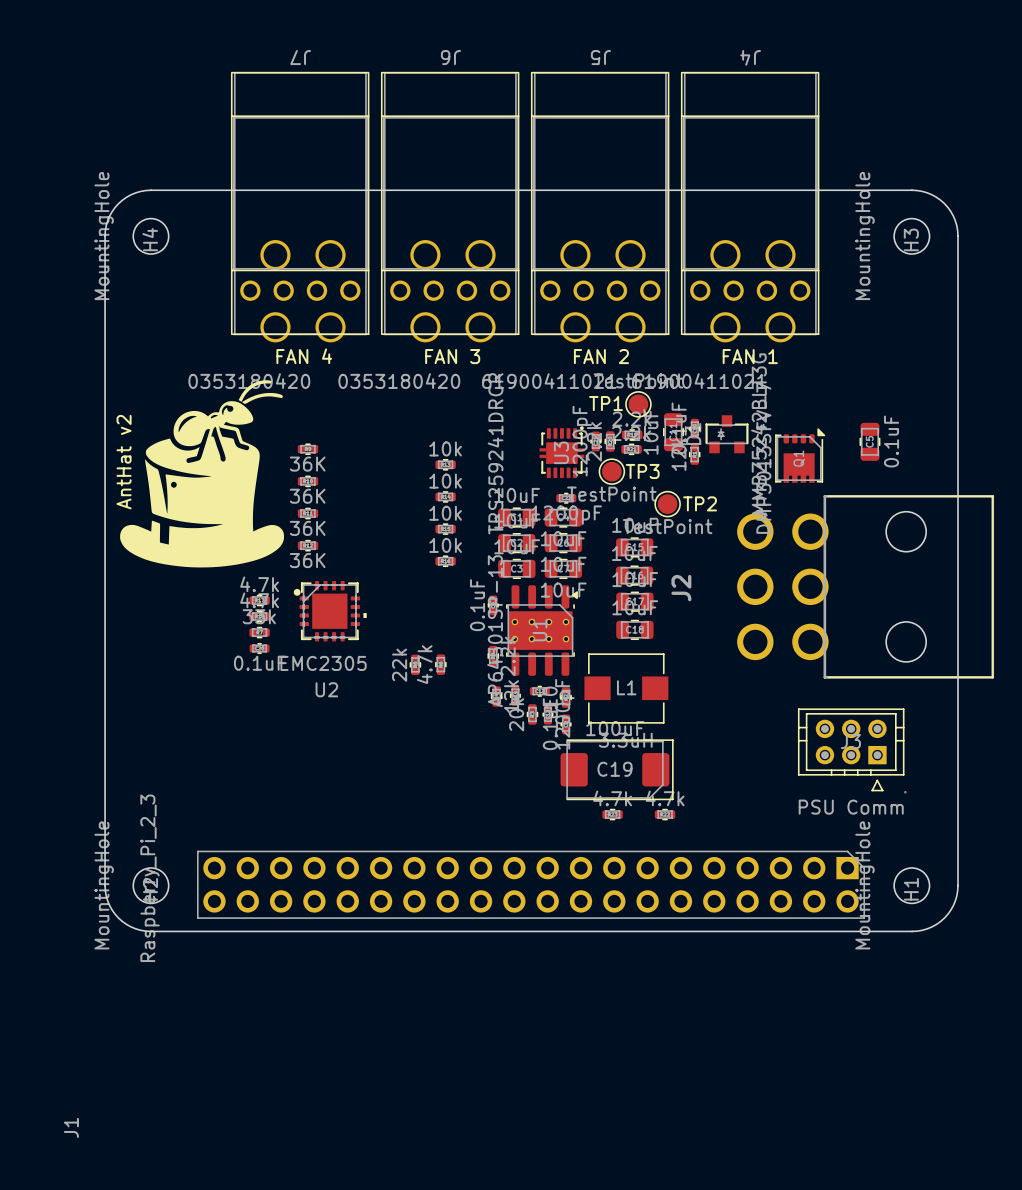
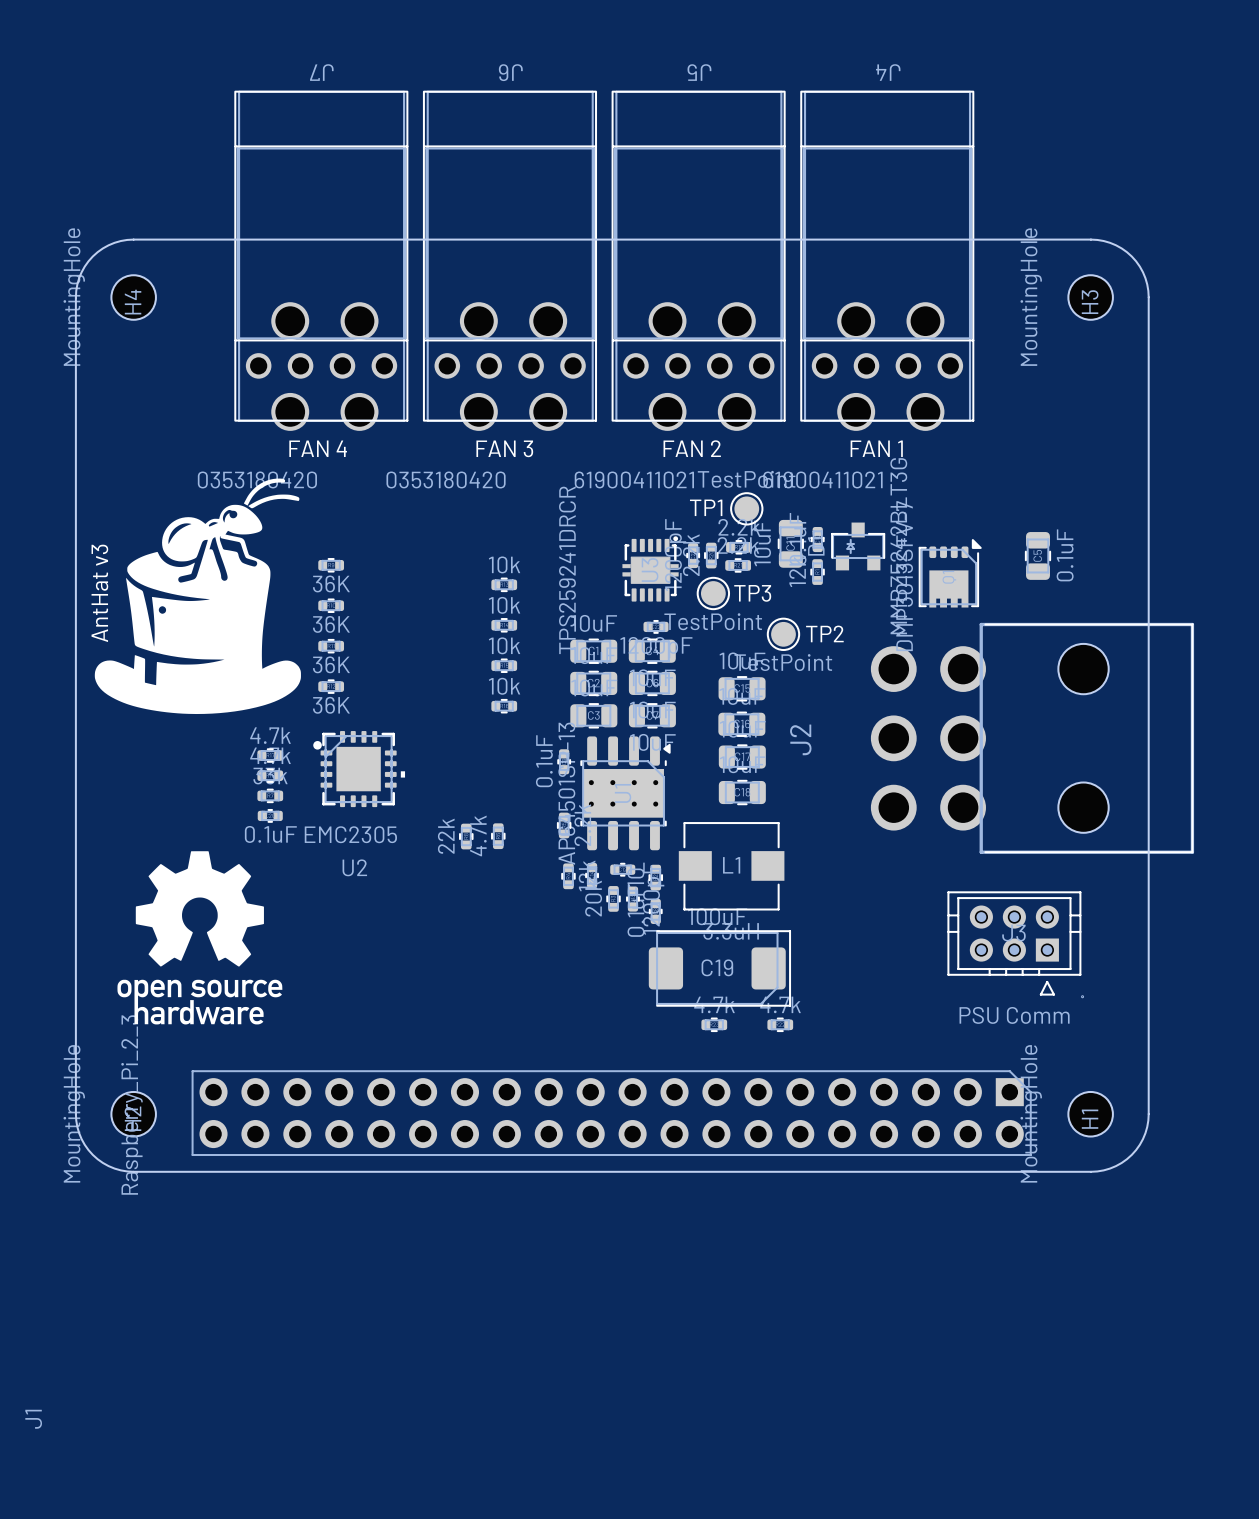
text: AntHat v2 (124, 462) -> AntHat v3 (99, 593)
drawing: none -> [117, 851, 283, 1025]

